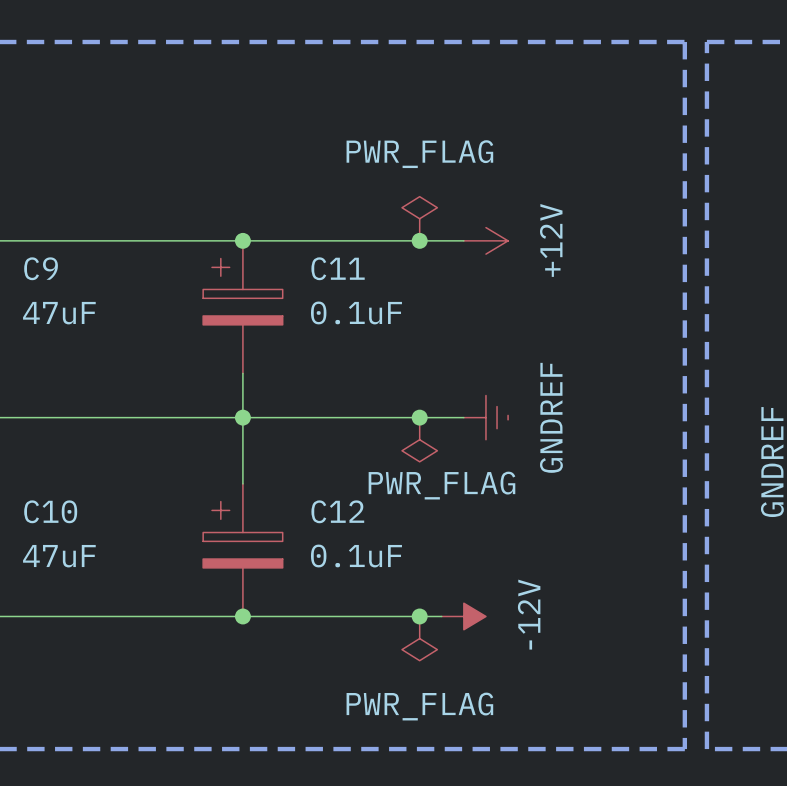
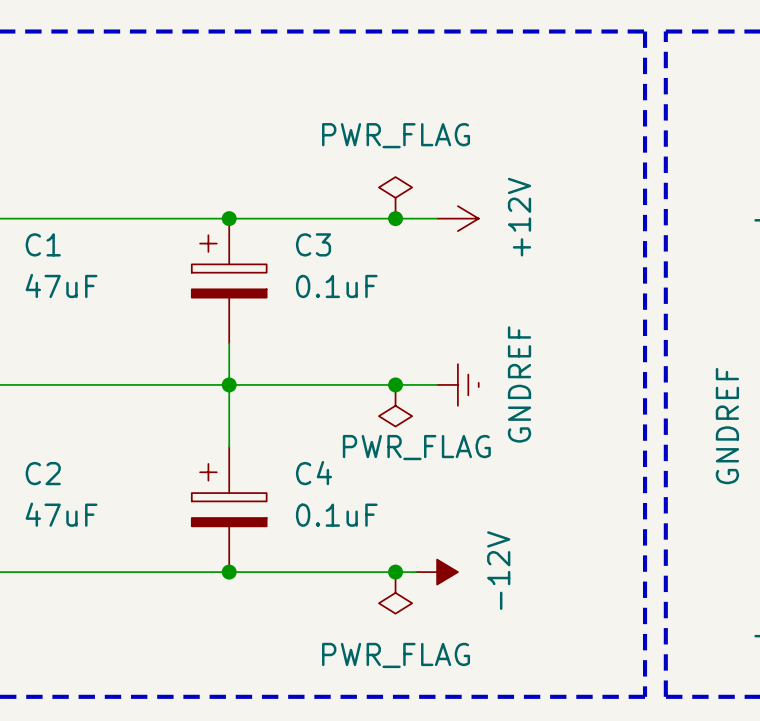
C9 name: C9 (41, 268) -> C1 (43, 244)
C11 name: C11 (338, 268) -> C3 (313, 244)
C10 name: C10 (50, 511) -> C2 (43, 473)
C12 name: C12 (337, 511) -> C4 (314, 473)

